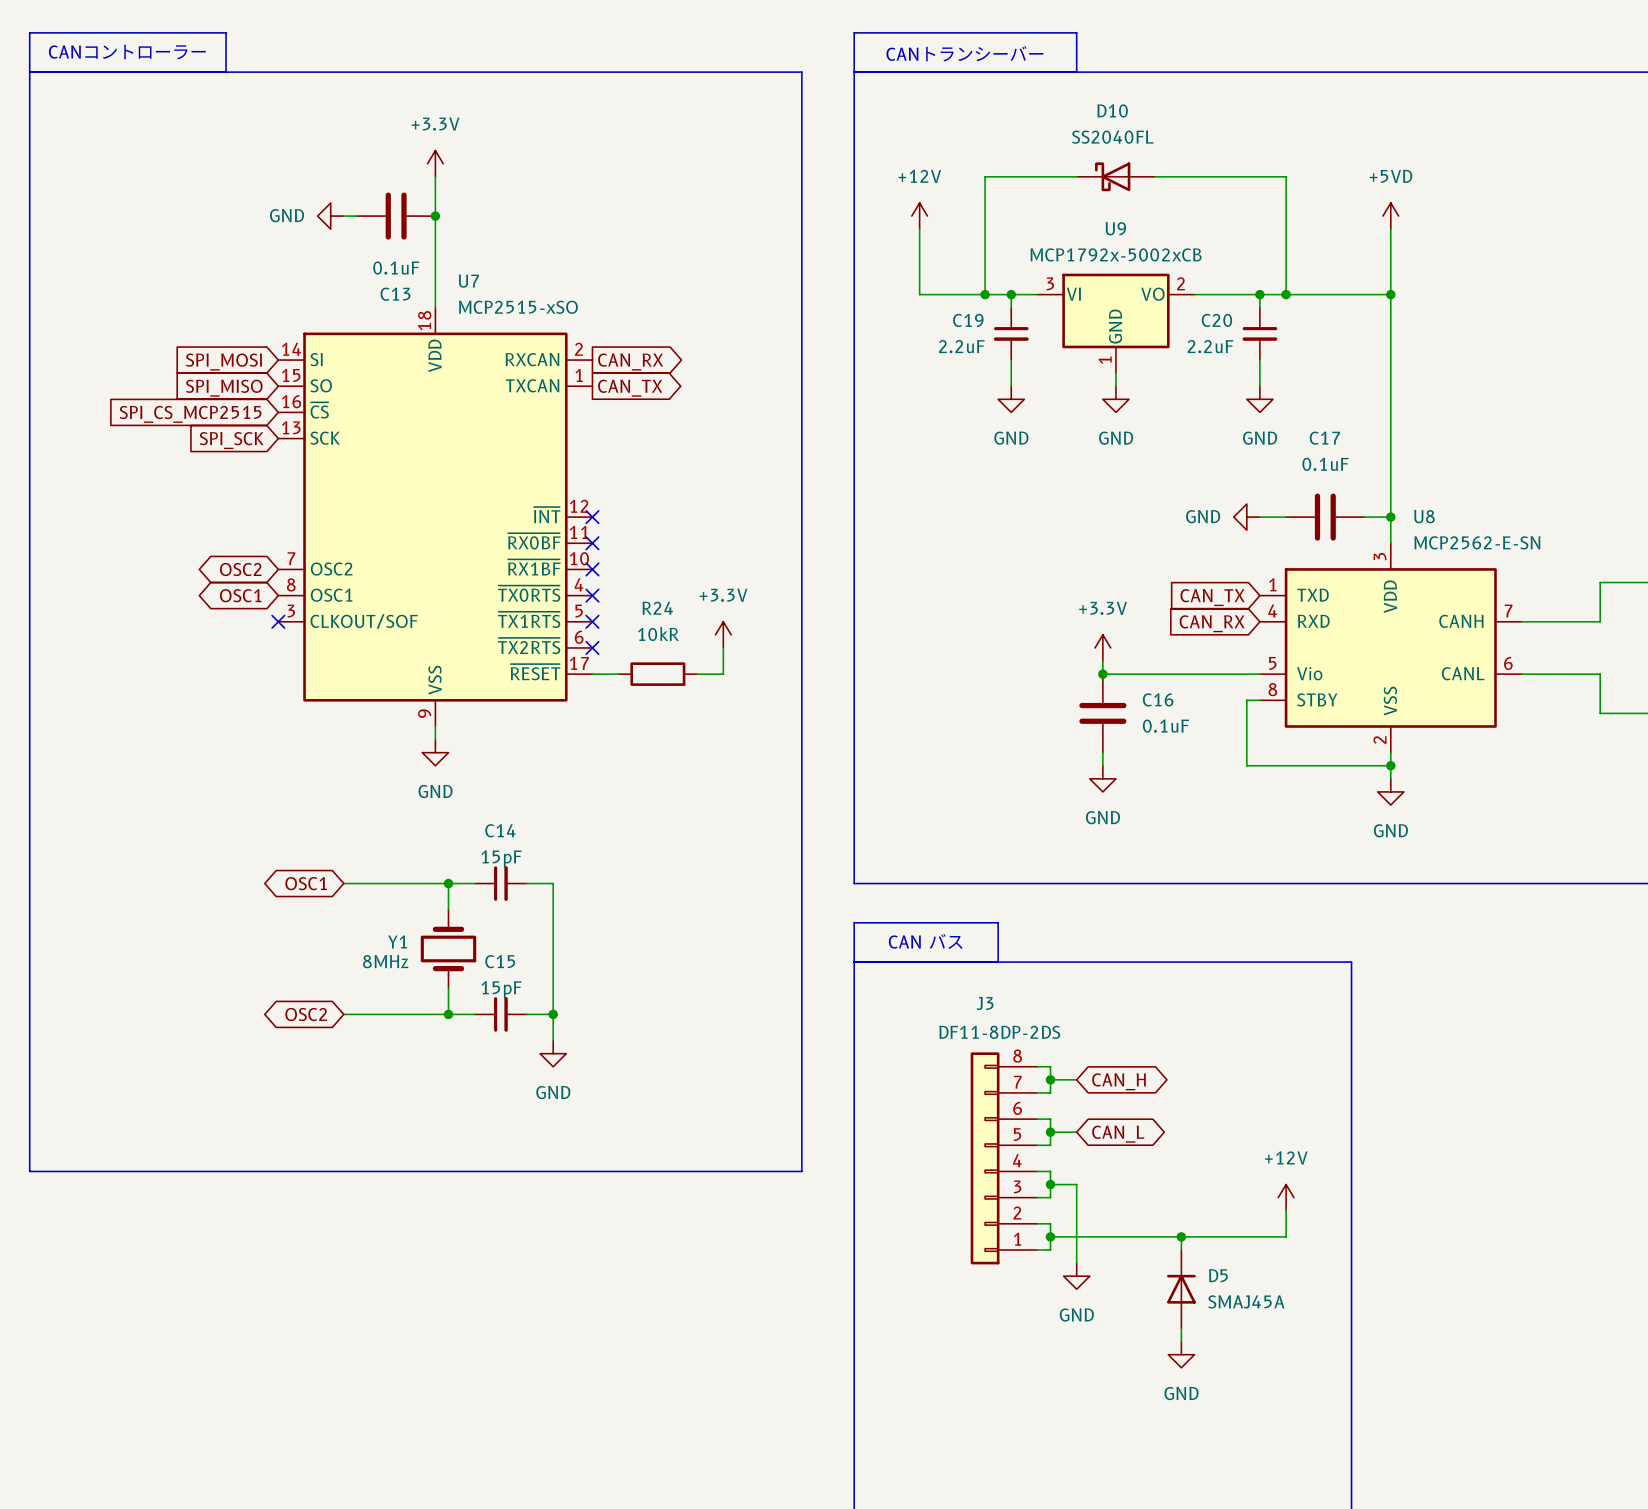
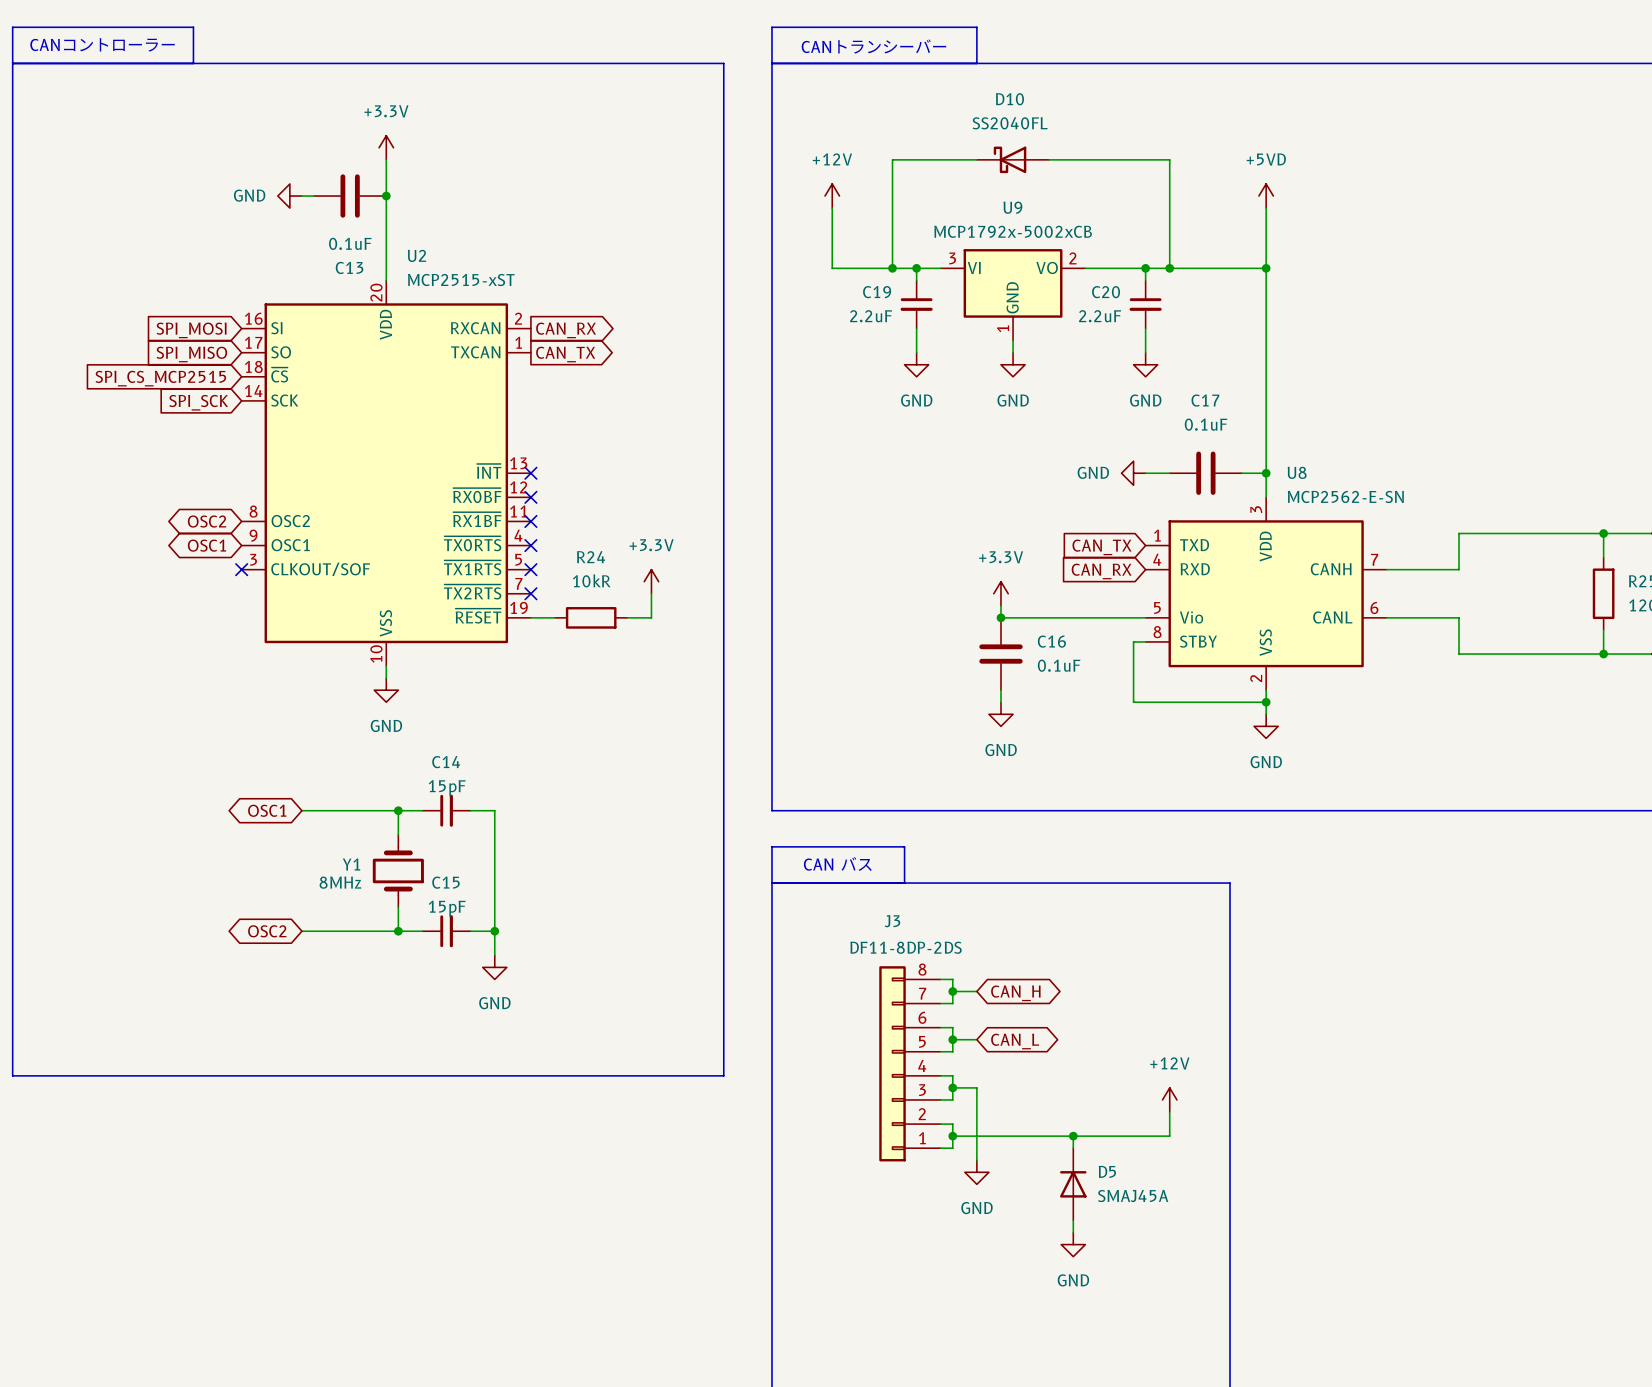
U7 name: U7 (468, 281) -> U2 (416, 255)
U7 symbol: [278, 307, 593, 727] -> [241, 280, 531, 667]
U7 value: MCP2515-xSO (518, 307) -> MCP2515-xST (461, 280)

